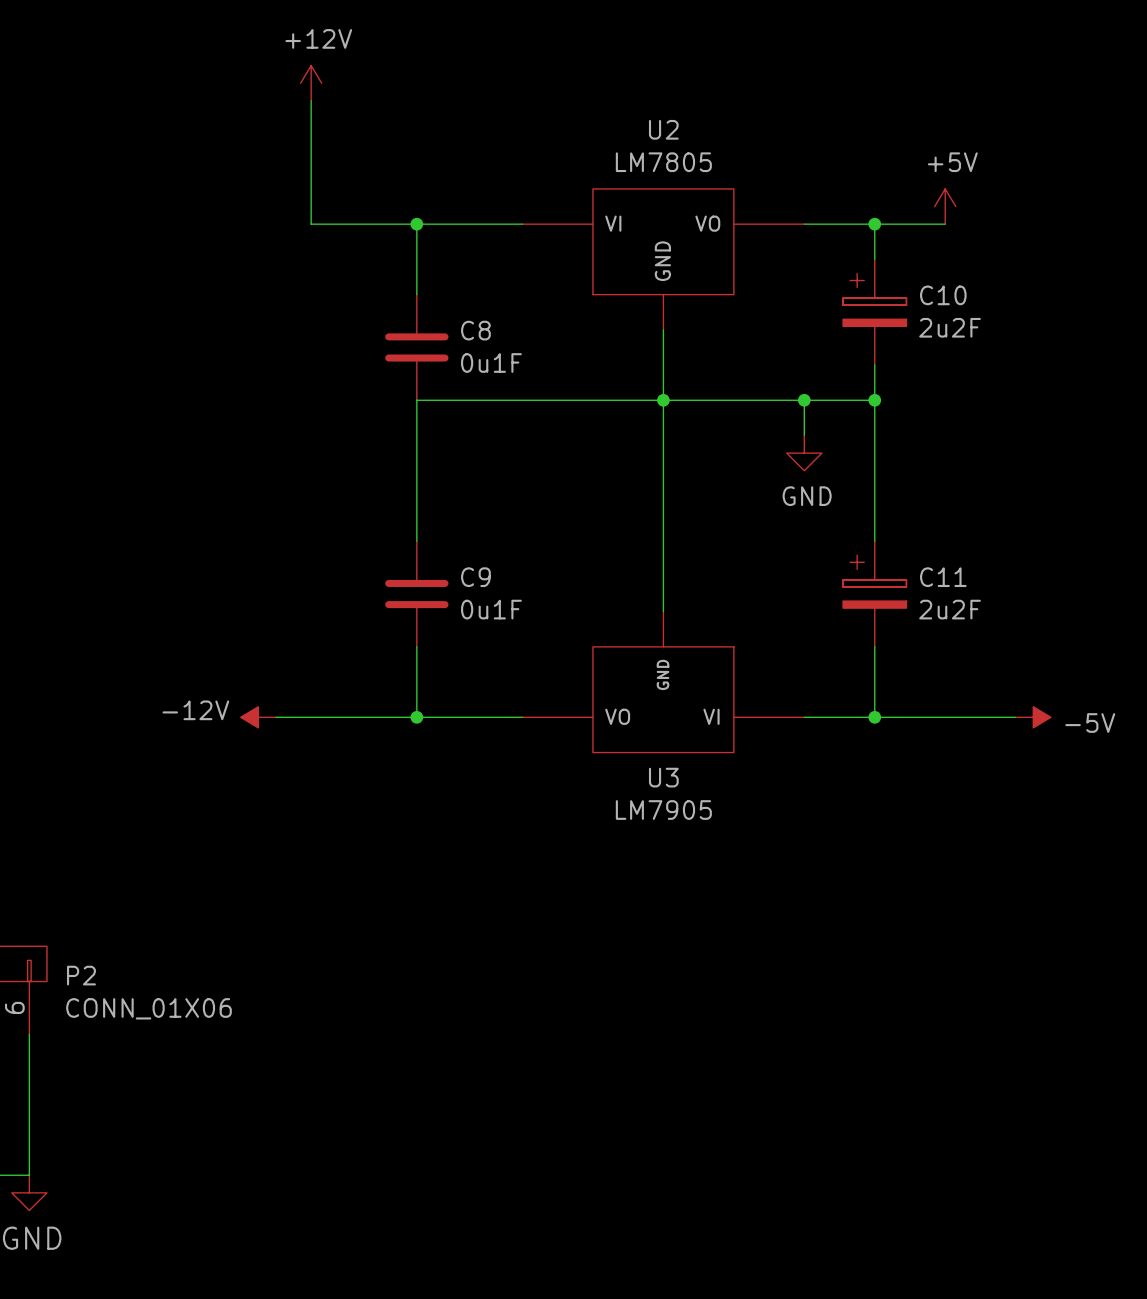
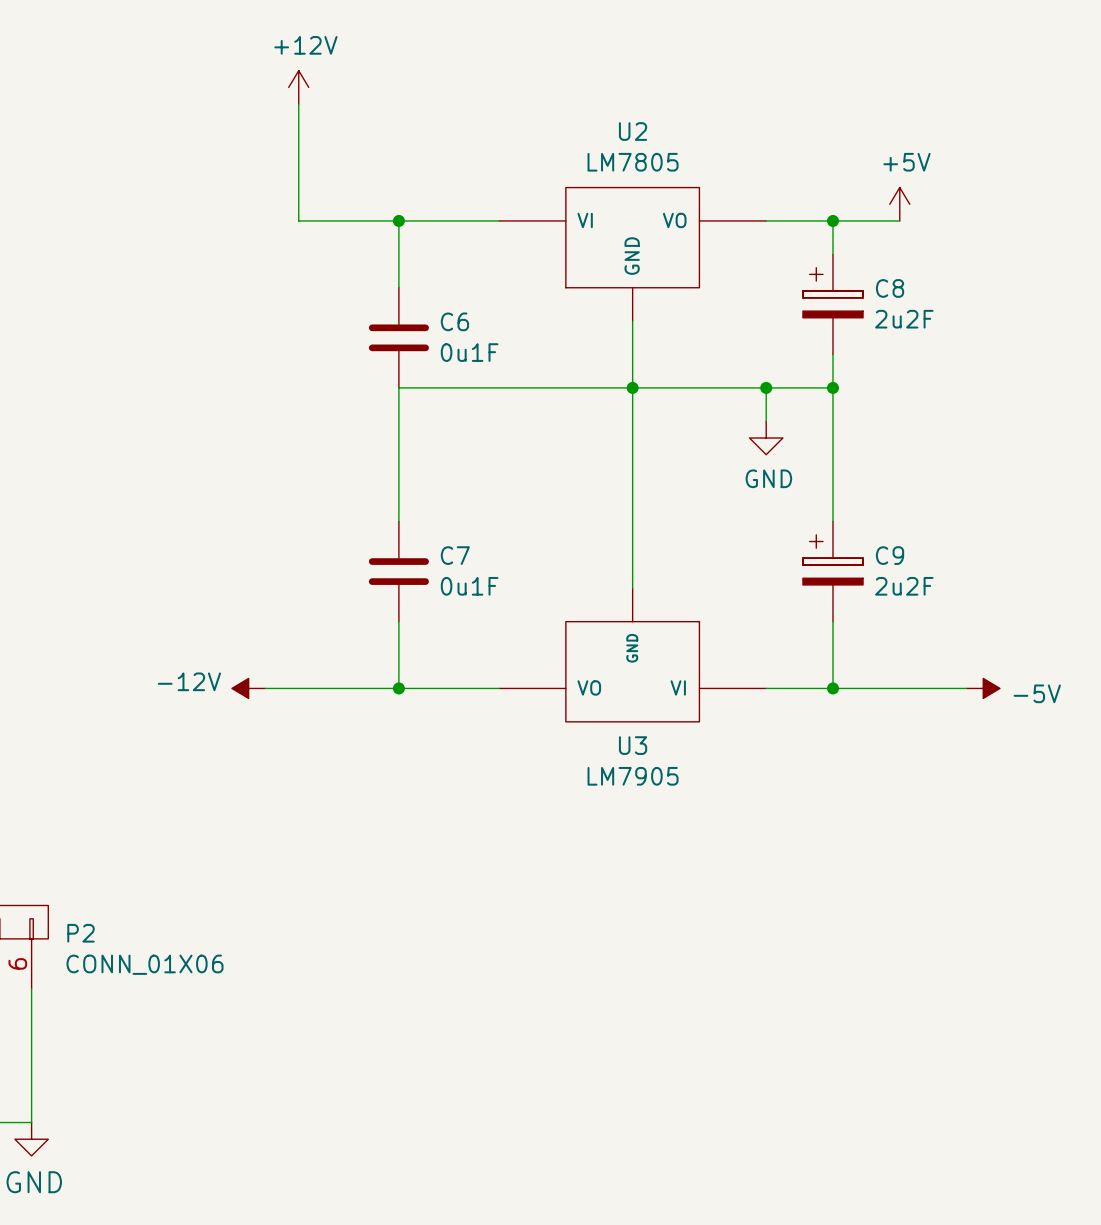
C10 name: C10 (943, 295) -> C8 (890, 288)
C8 name: C8 (475, 330) -> C6 (454, 321)
C9 name: C9 (475, 577) -> C7 (455, 555)
C11 name: C11 (943, 577) -> C9 (890, 555)

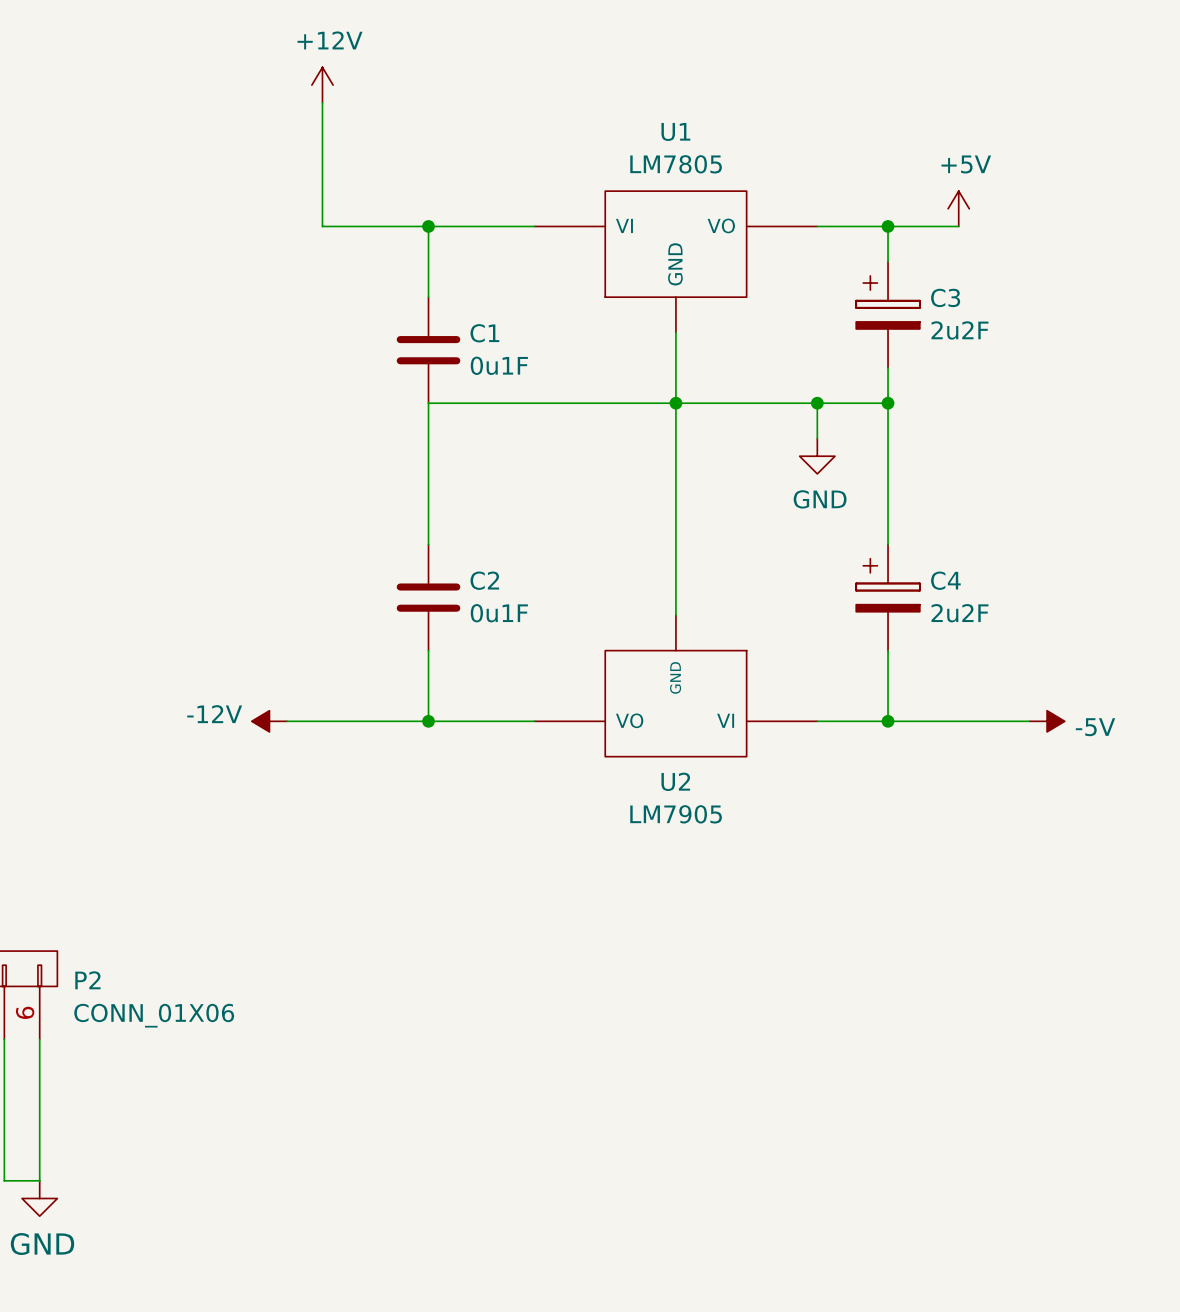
U2 name: U2 (633, 131) -> U1 (675, 131)
C8 name: C8 (890, 288) -> C3 (945, 297)
C6 name: C6 (454, 321) -> C1 (484, 333)
C7 name: C7 (455, 555) -> C2 (484, 580)
C9 name: C9 (890, 555) -> C4 (945, 580)
U3 name: U3 (633, 745) -> U2 (675, 781)

